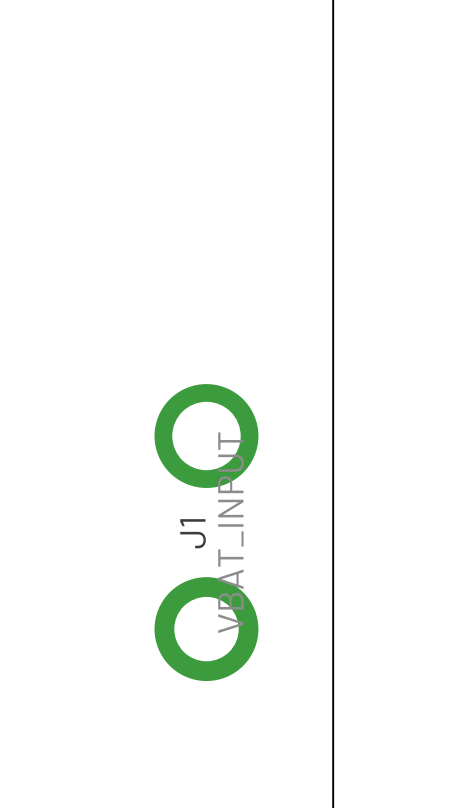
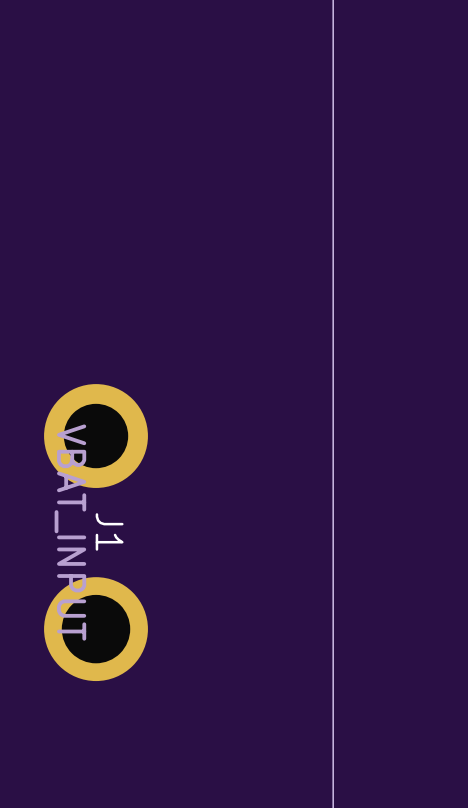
J1 rotation: 0° (206, 532) -> 180° (96, 532)

